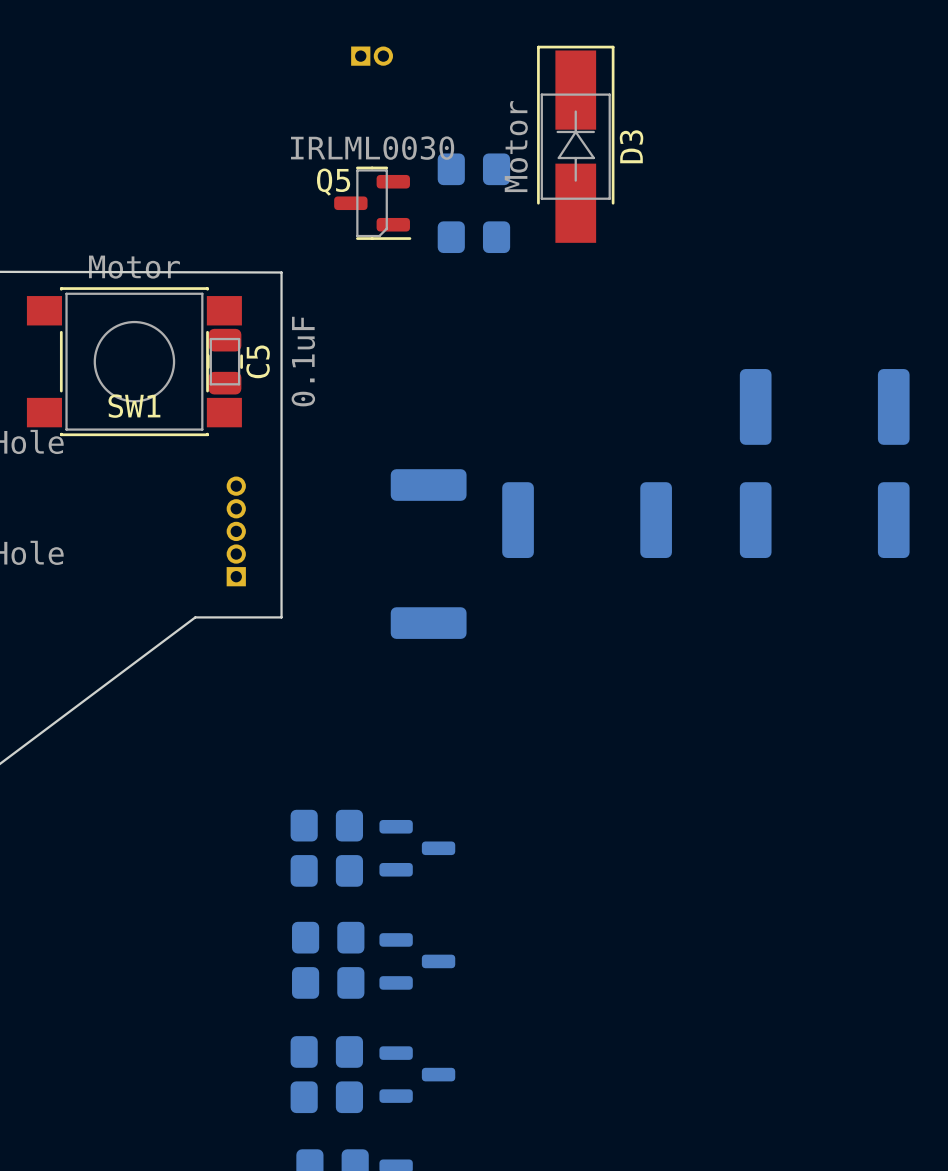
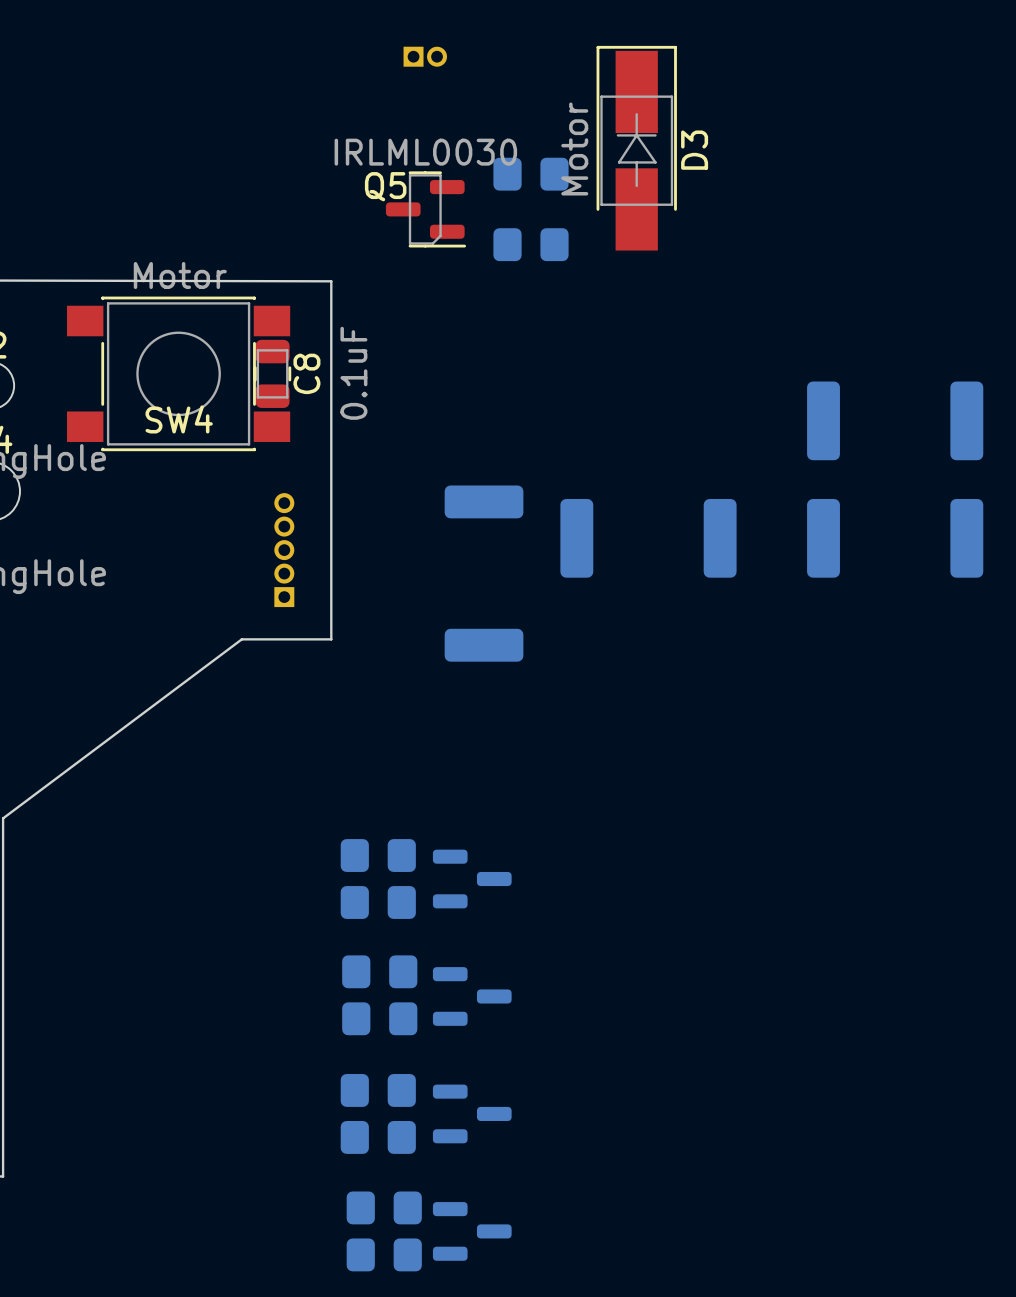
C5 name: C5 (258, 361) -> C8 (306, 373)
SW1 name: SW1 (134, 406) -> SW4 (179, 419)

